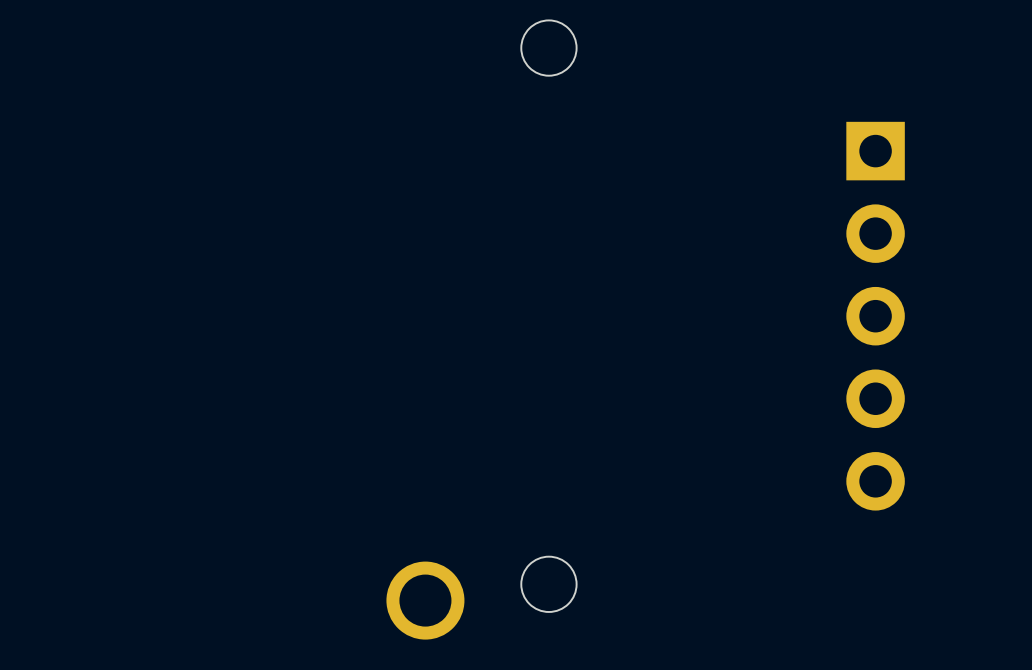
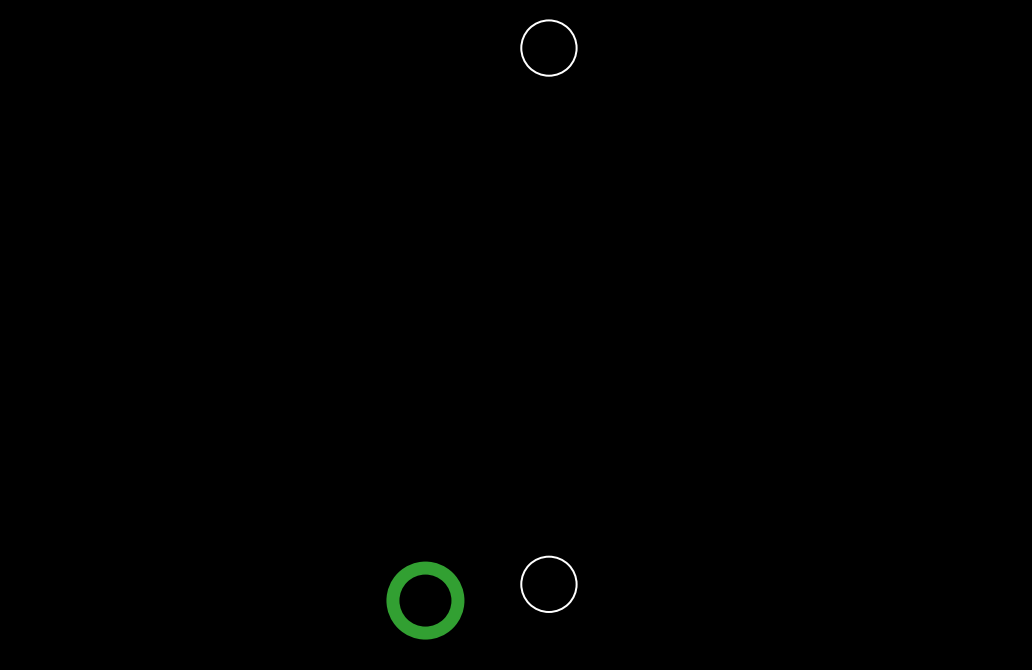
part: (875, 316) -> none

